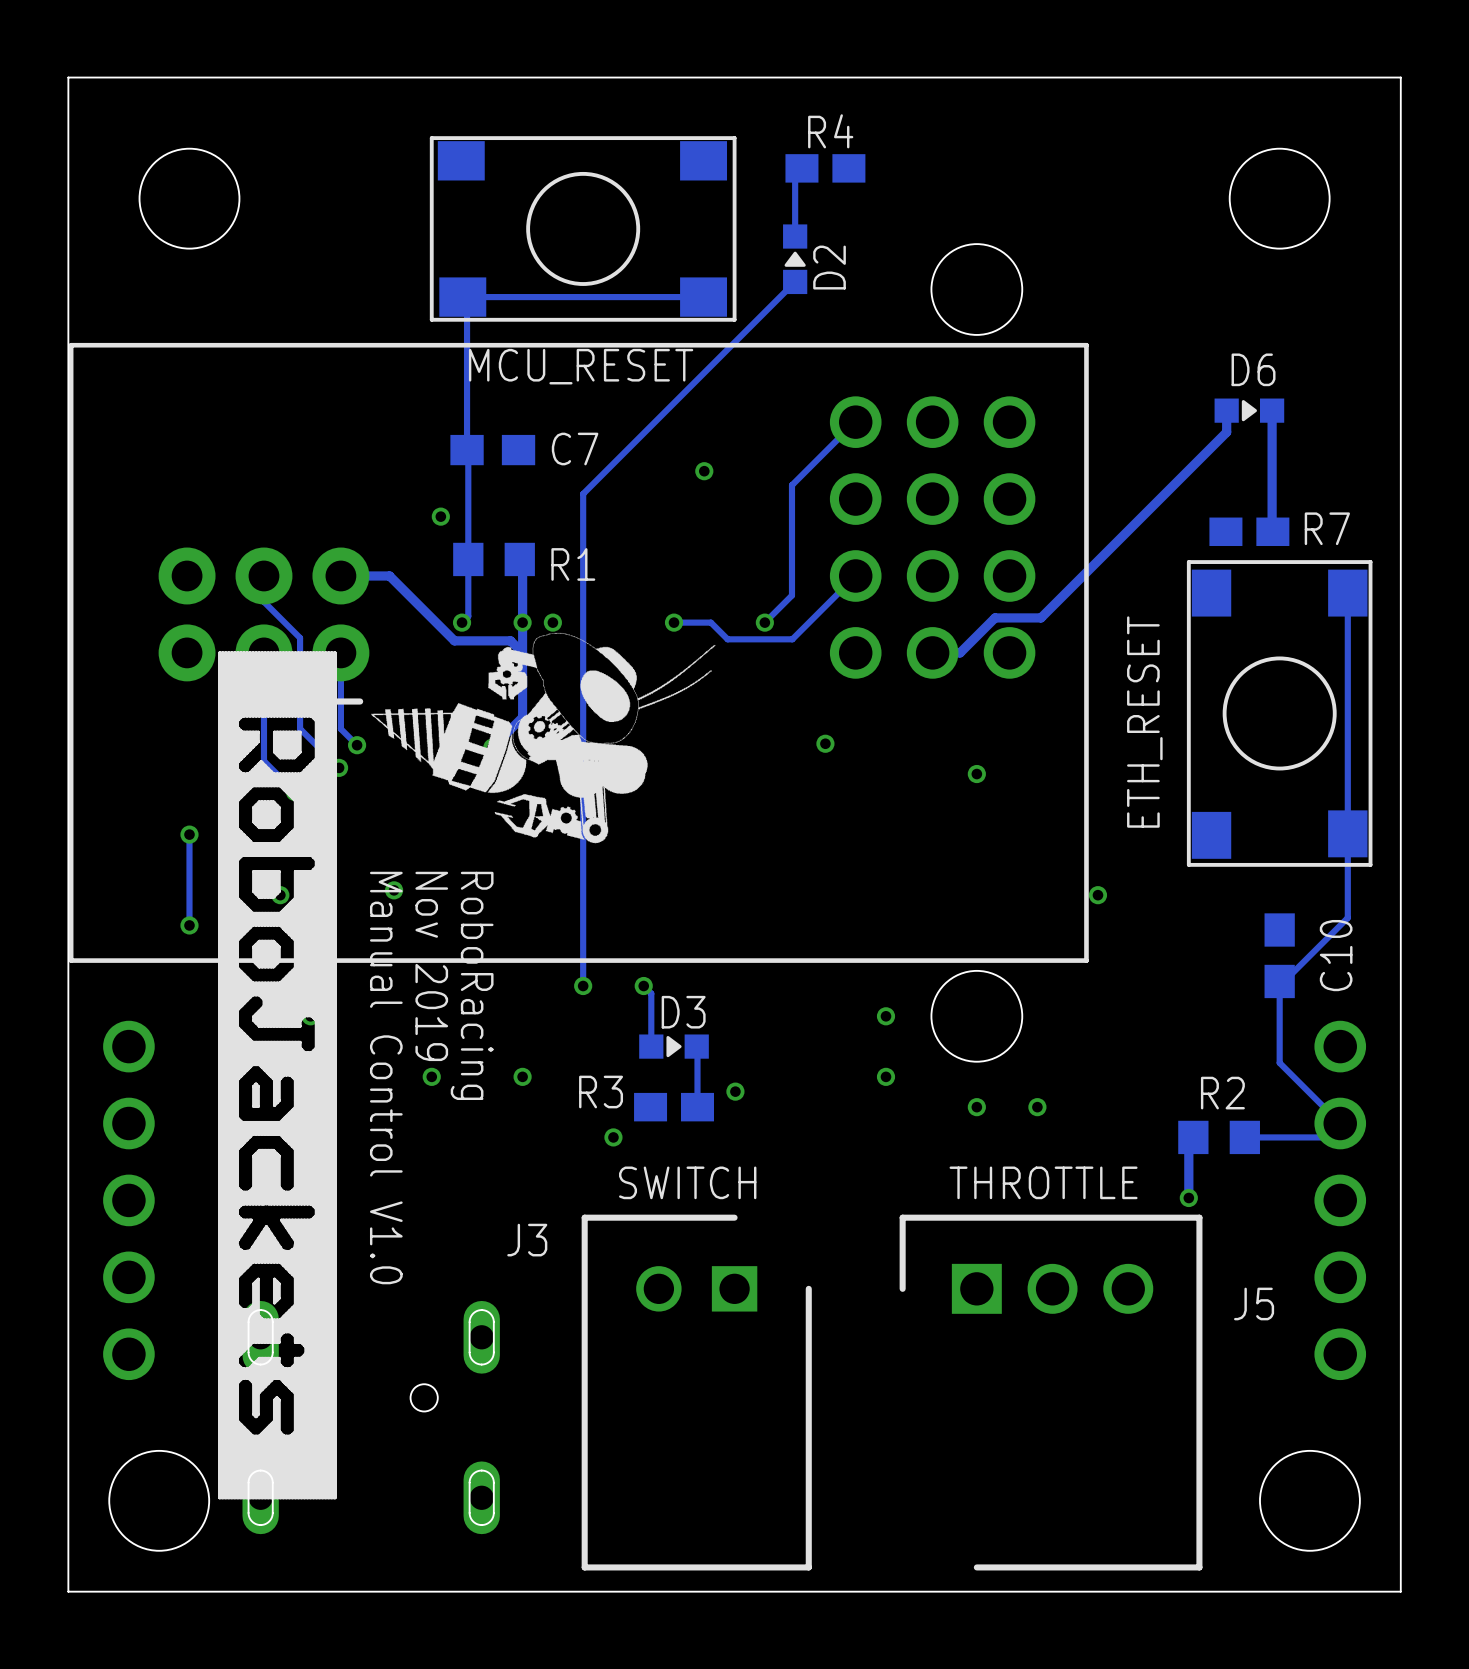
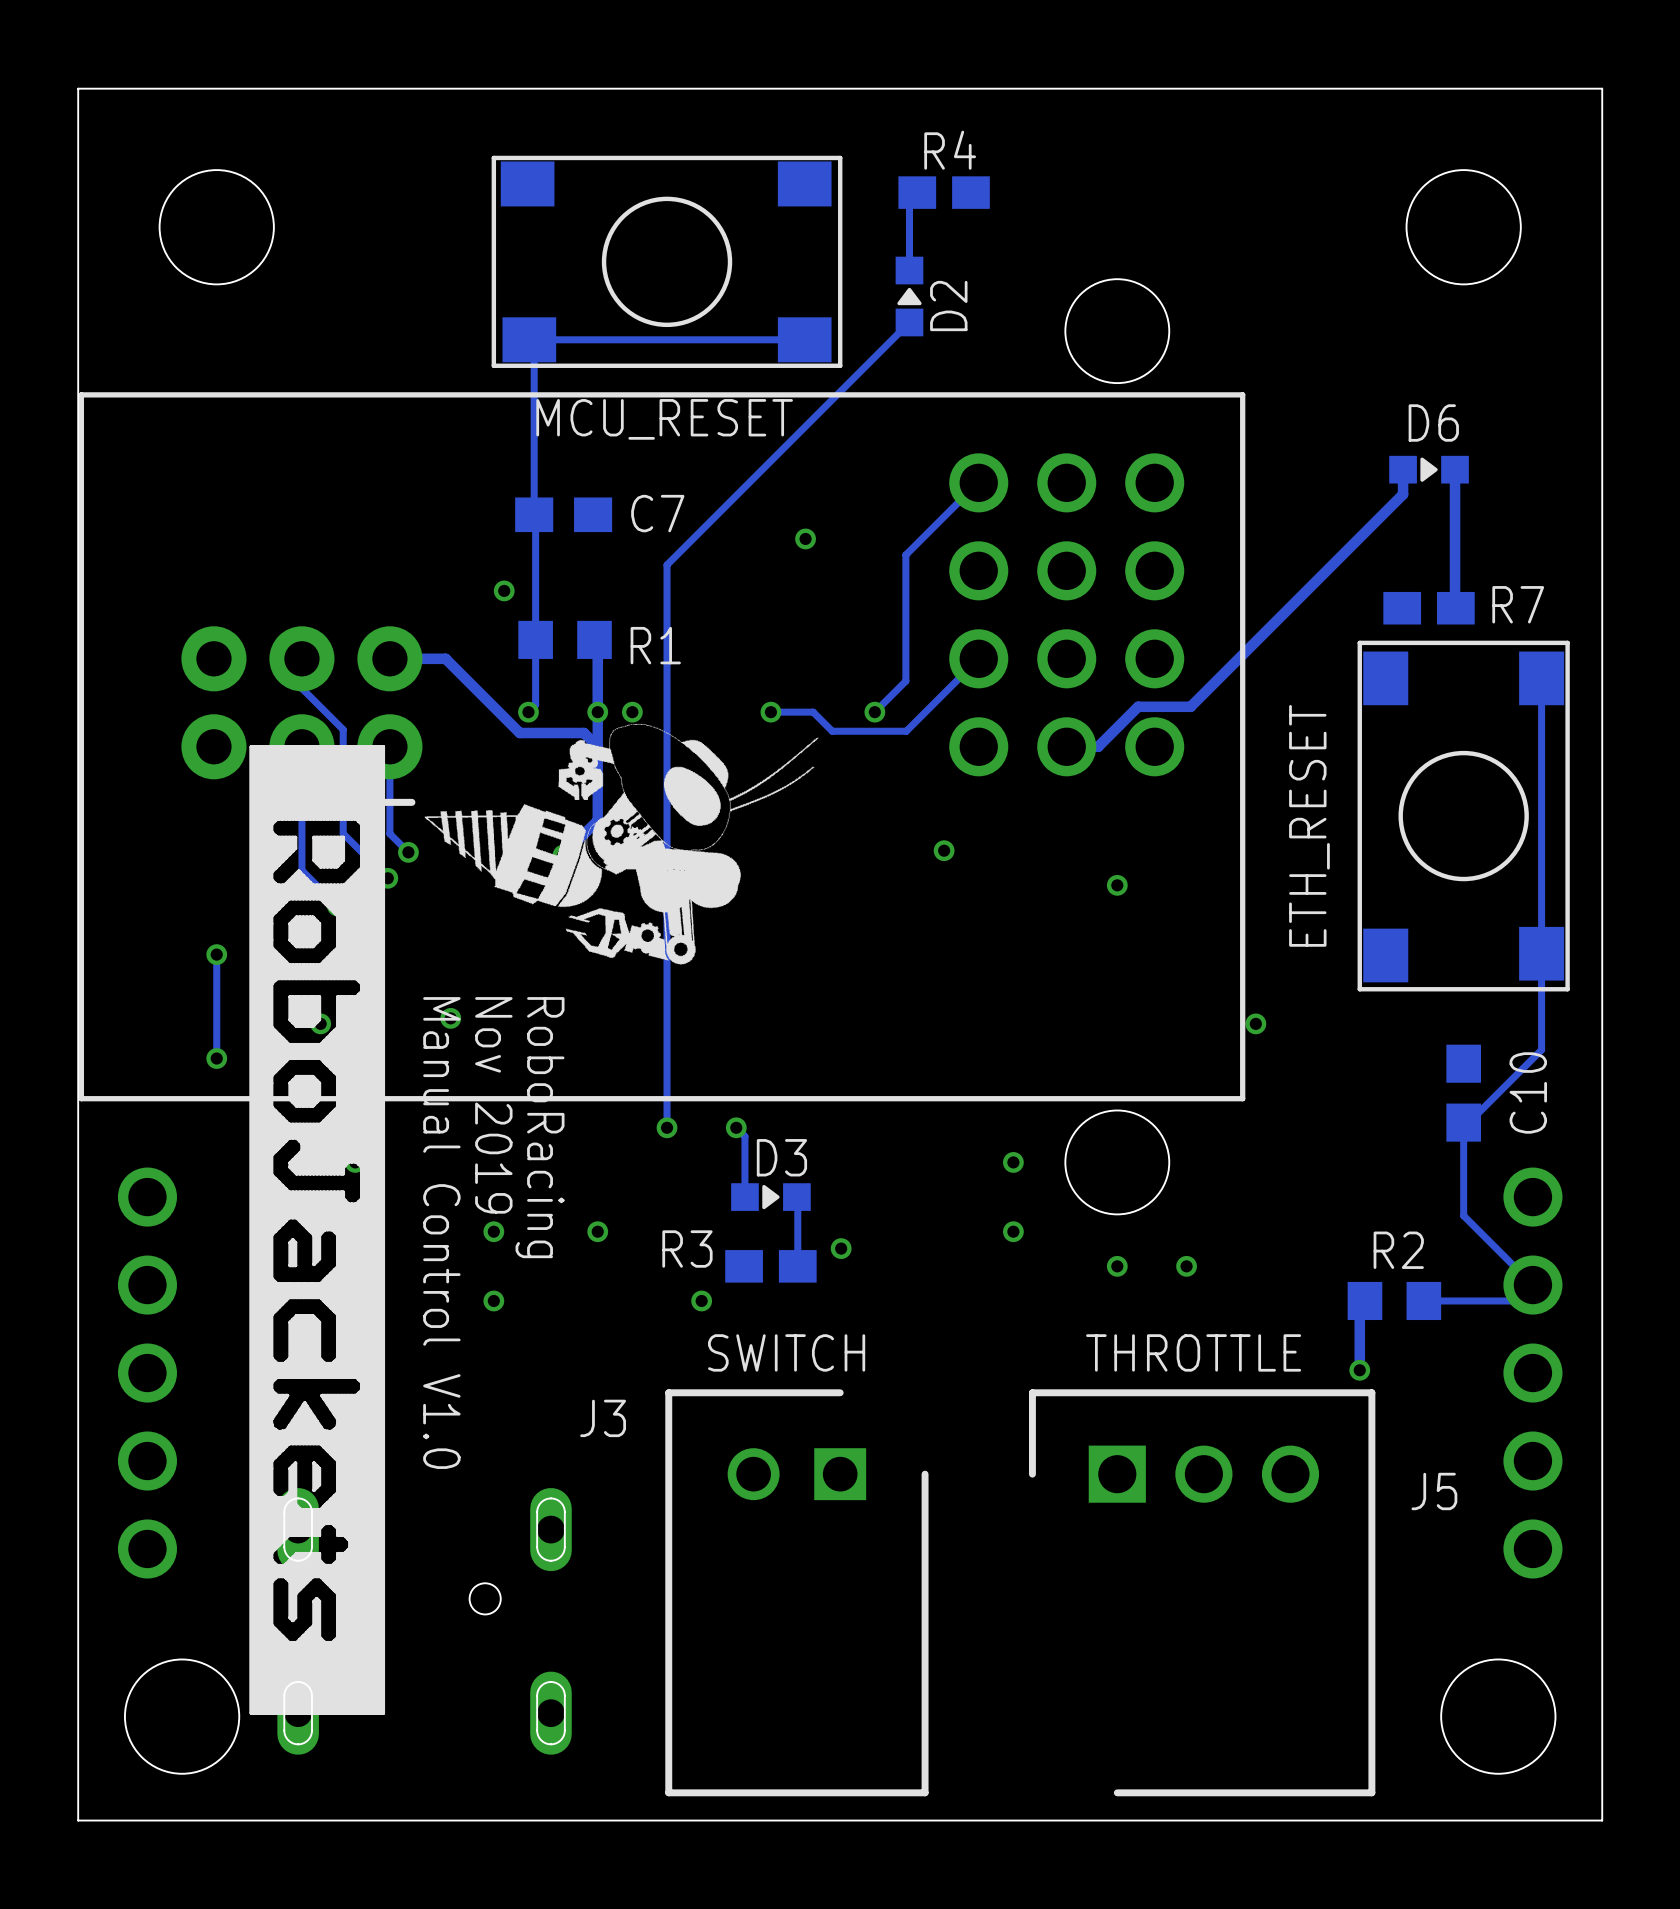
via: none -> (493, 1300)

